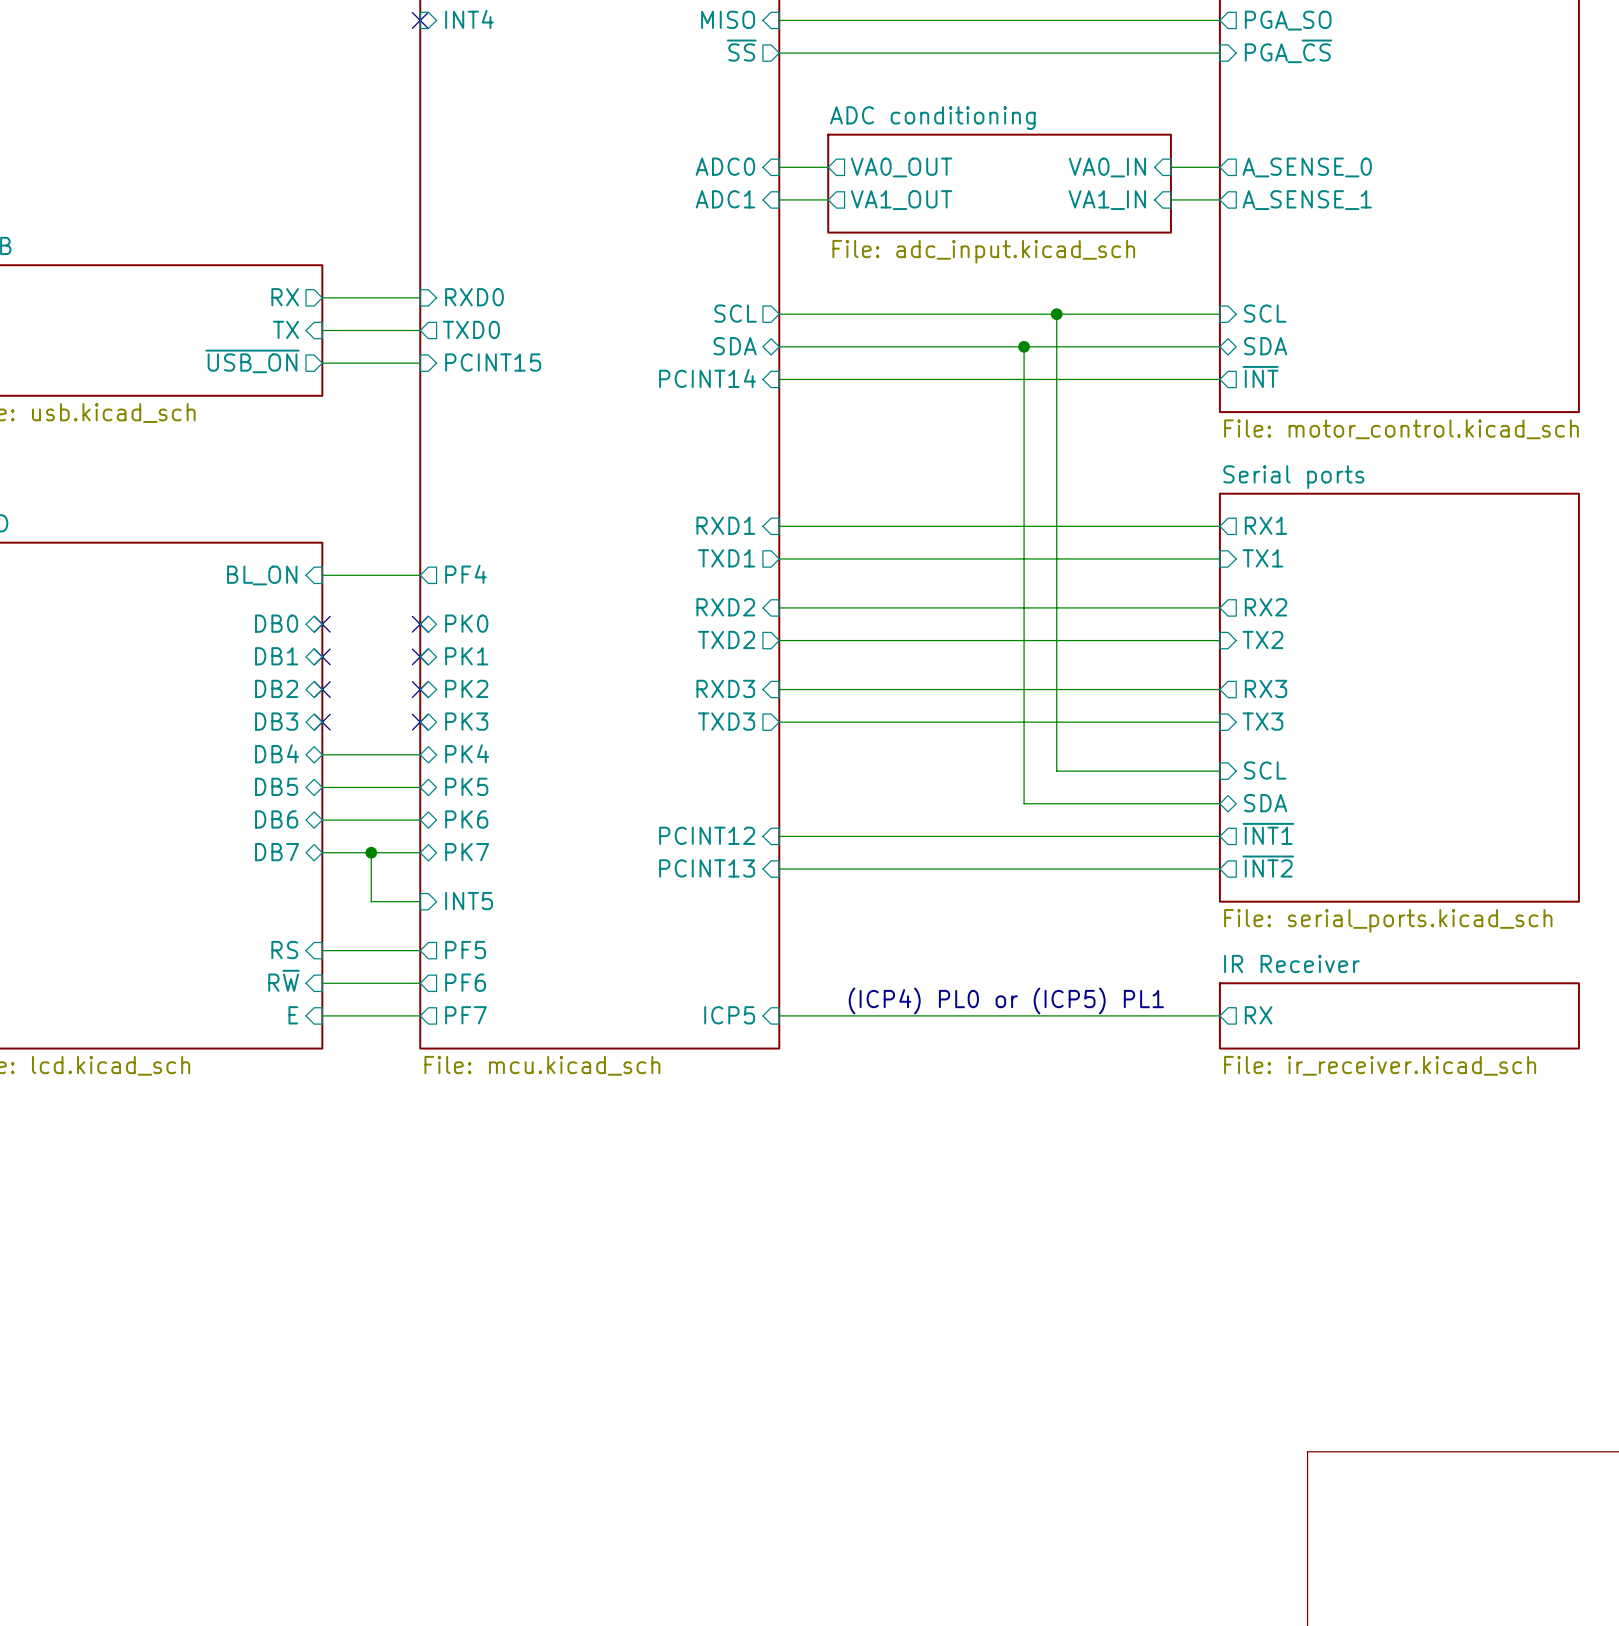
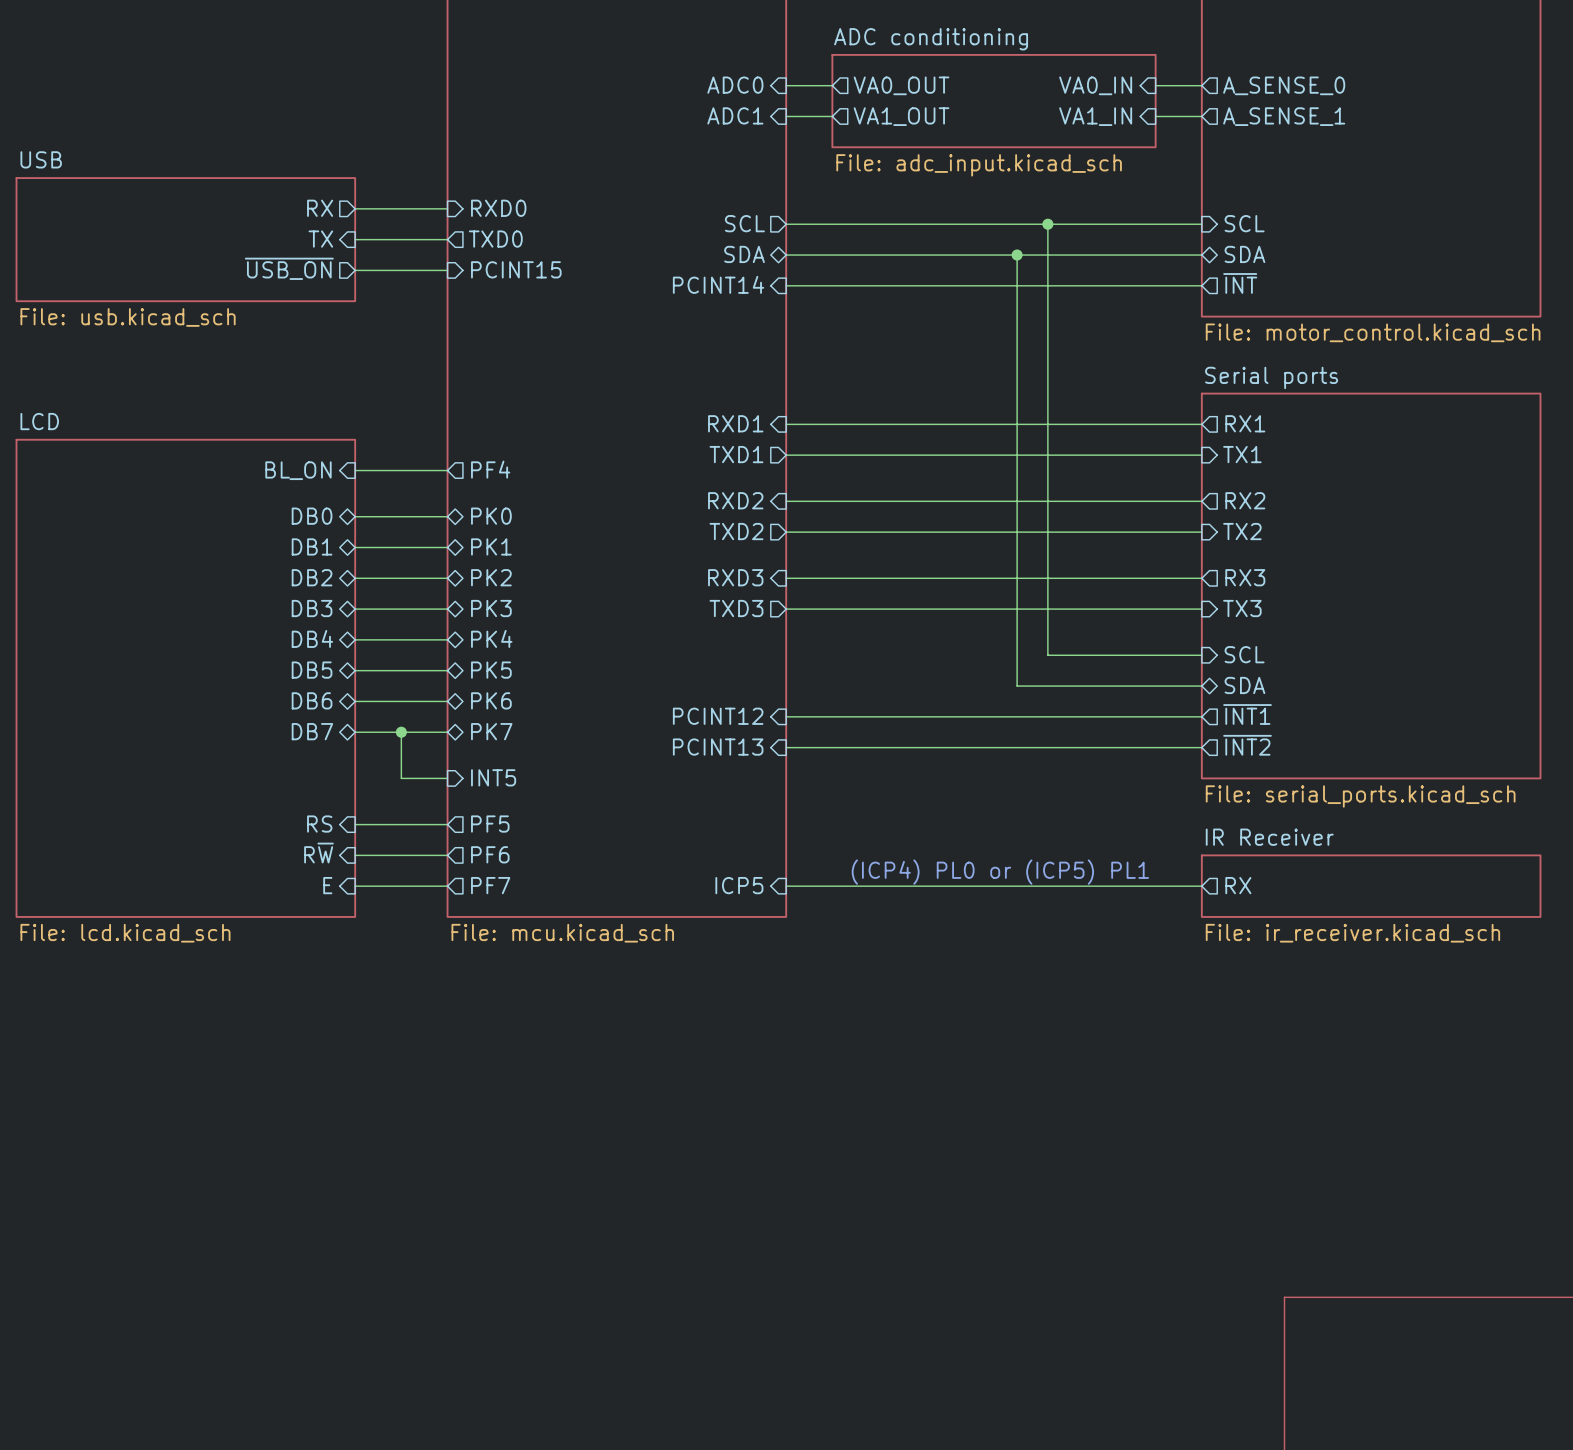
wire: none -> (355, 516) (447, 516)
no-connect mark: (322, 624) -> none
no-connect mark: (420, 624) -> none
wire: none -> (355, 547) (447, 547)
no-connect mark: (322, 656) -> none
no-connect mark: (420, 656) -> none
wire: none -> (355, 578) (447, 578)
no-connect mark: (322, 689) -> none
no-connect mark: (420, 689) -> none
wire: none -> (355, 609) (447, 609)
no-connect mark: (322, 722) -> none
no-connect mark: (420, 722) -> none

